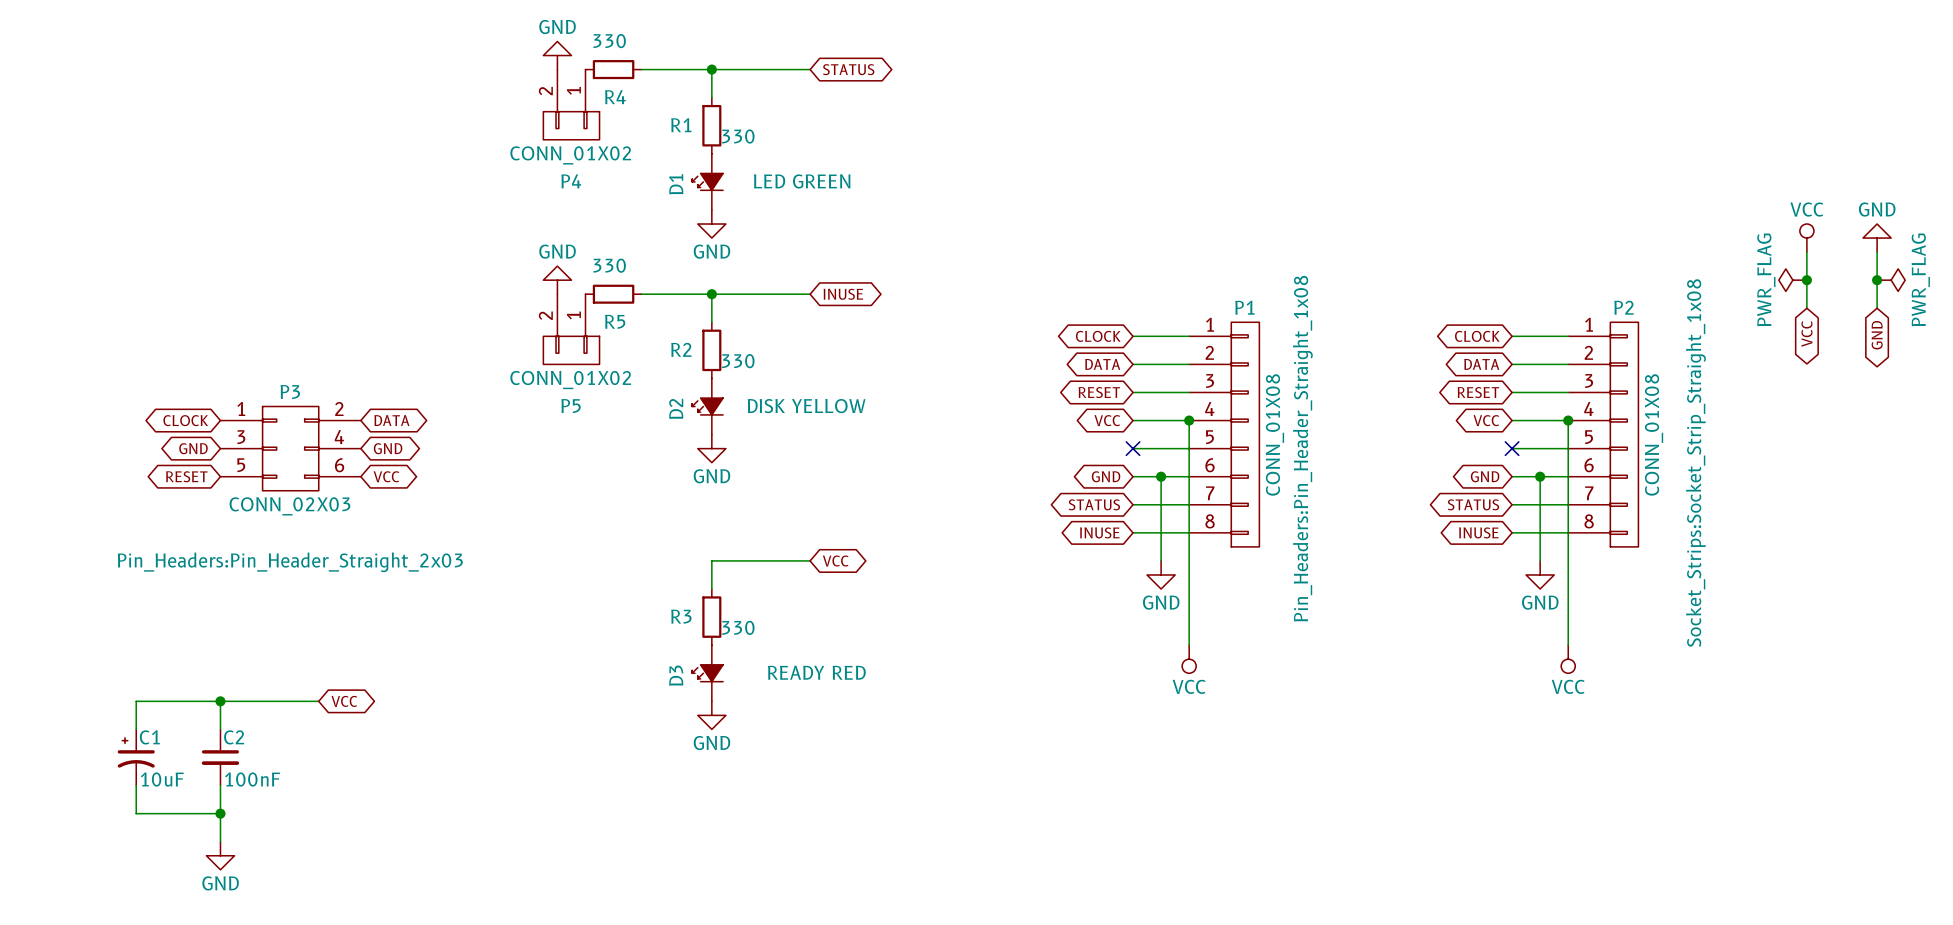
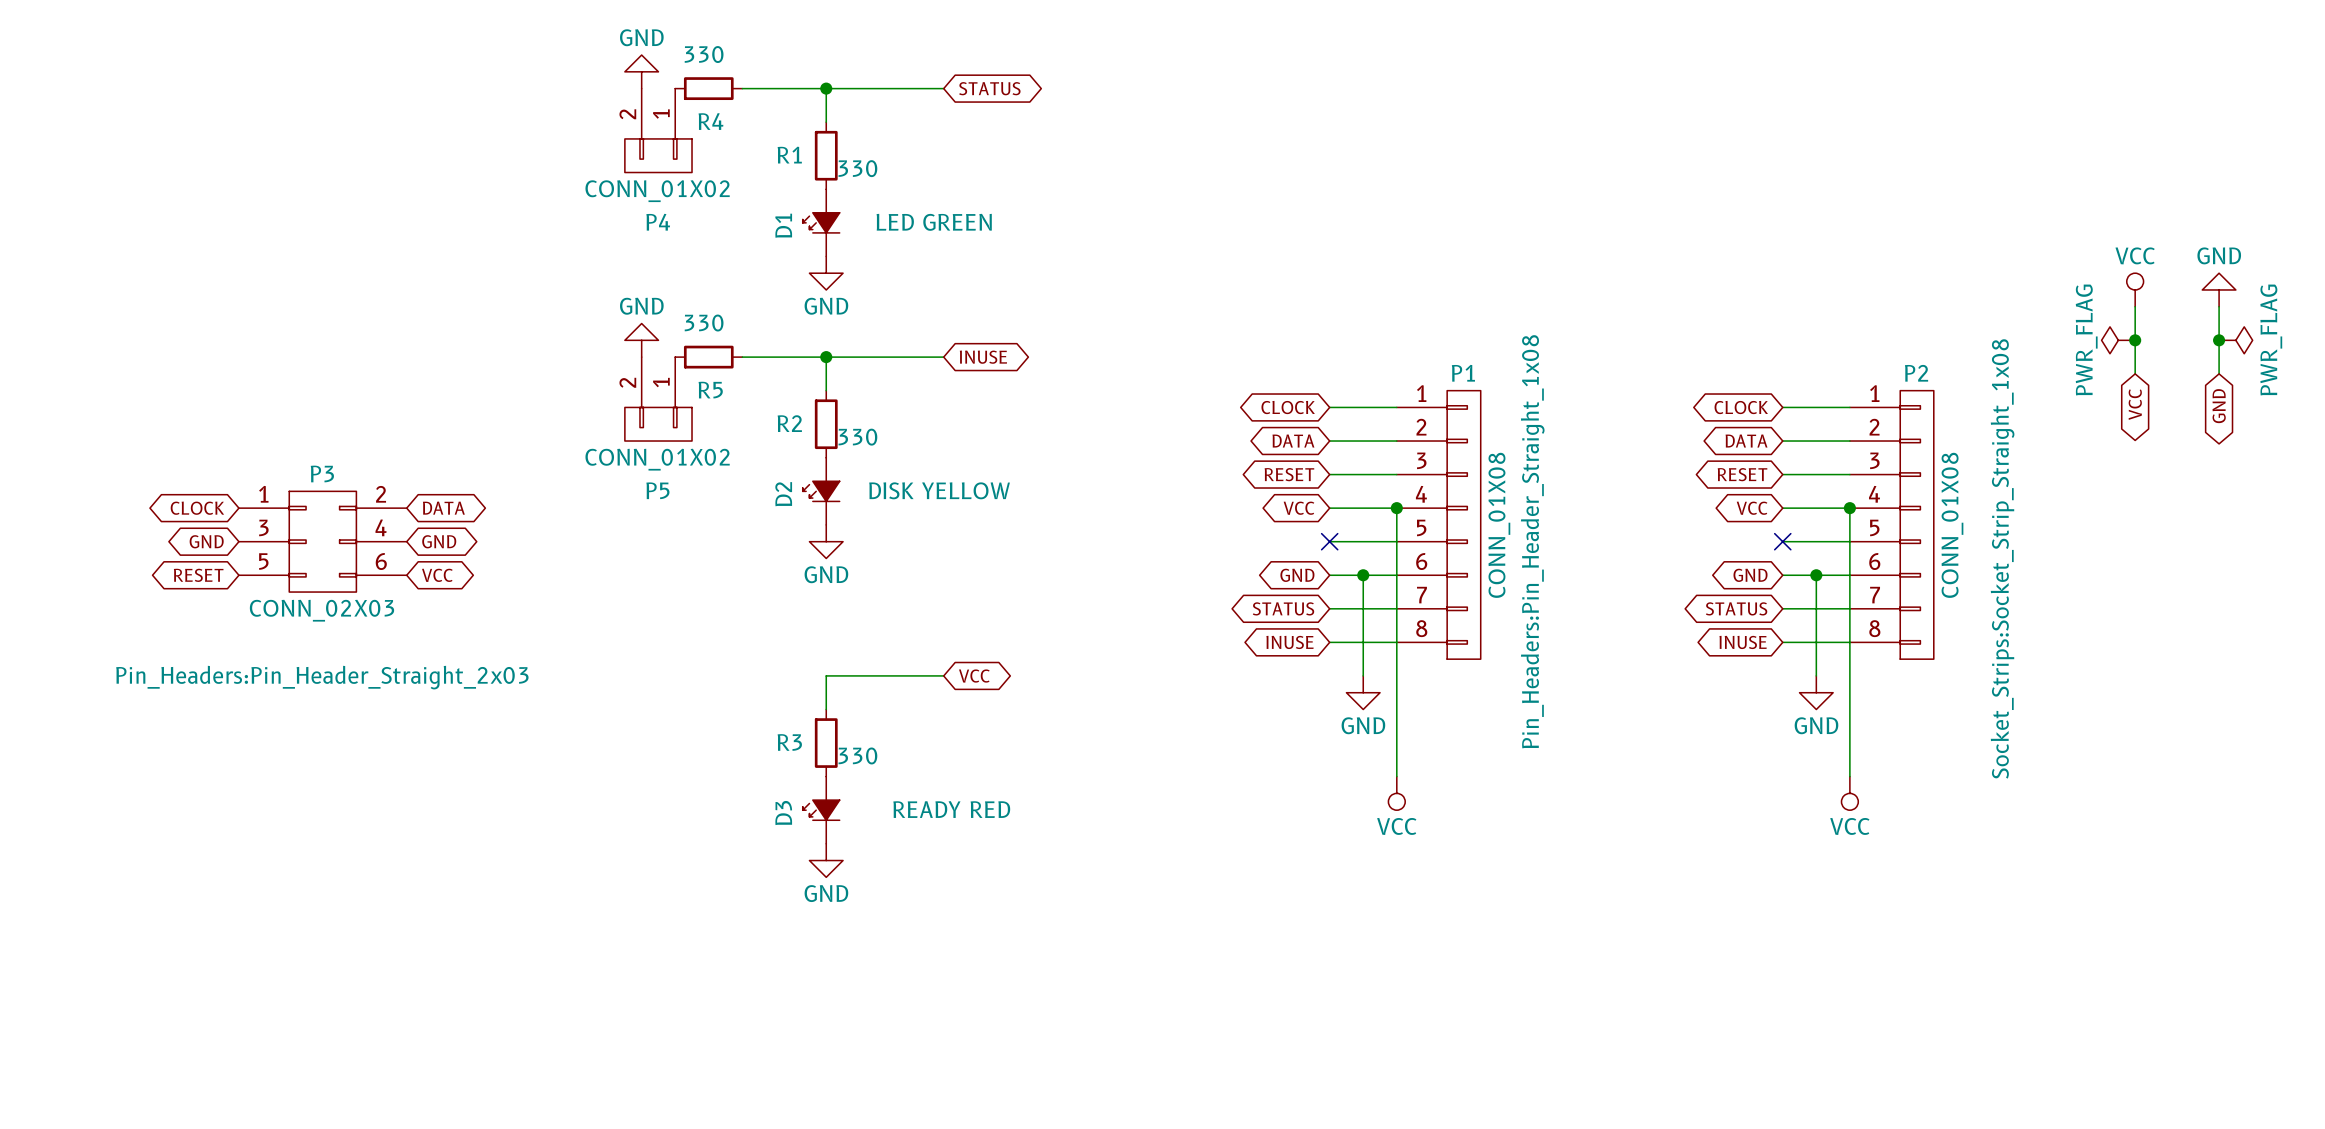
wire: (220, 701) (220, 729) -> none
junction: (220, 701) -> none
wire: (318, 701) (136, 701) (136, 729) -> none
global label: VCC (344, 701) -> none
C1: 10uF (136, 757) -> none
C2: 100nF (220, 757) -> none
wire: (136, 785) (136, 813) (220, 813) -> none
wire: (220, 785) (220, 841) -> none
junction: (220, 813) -> none
power symbol: GND (220, 855) -> none

